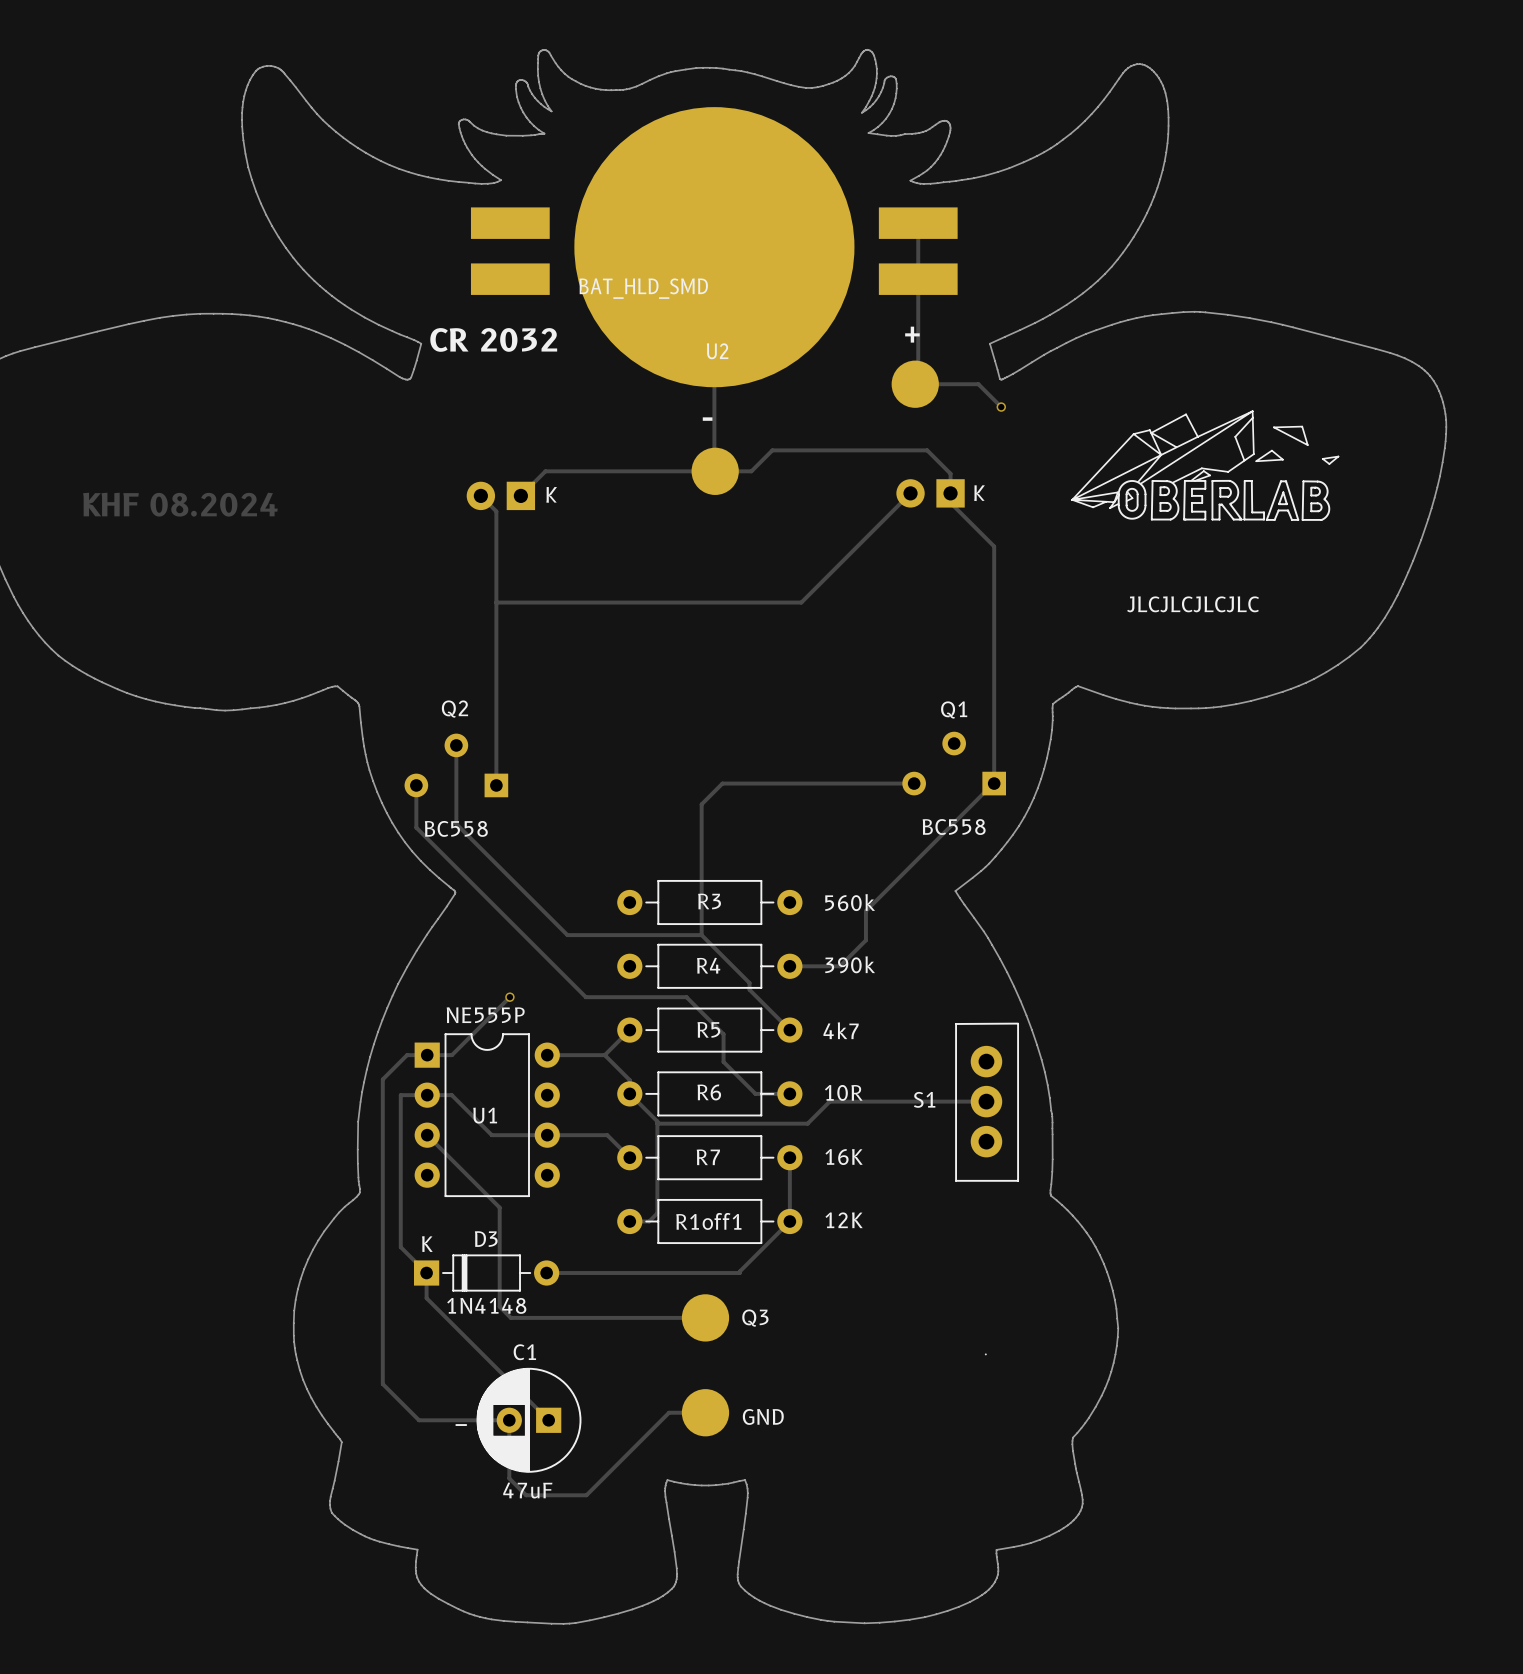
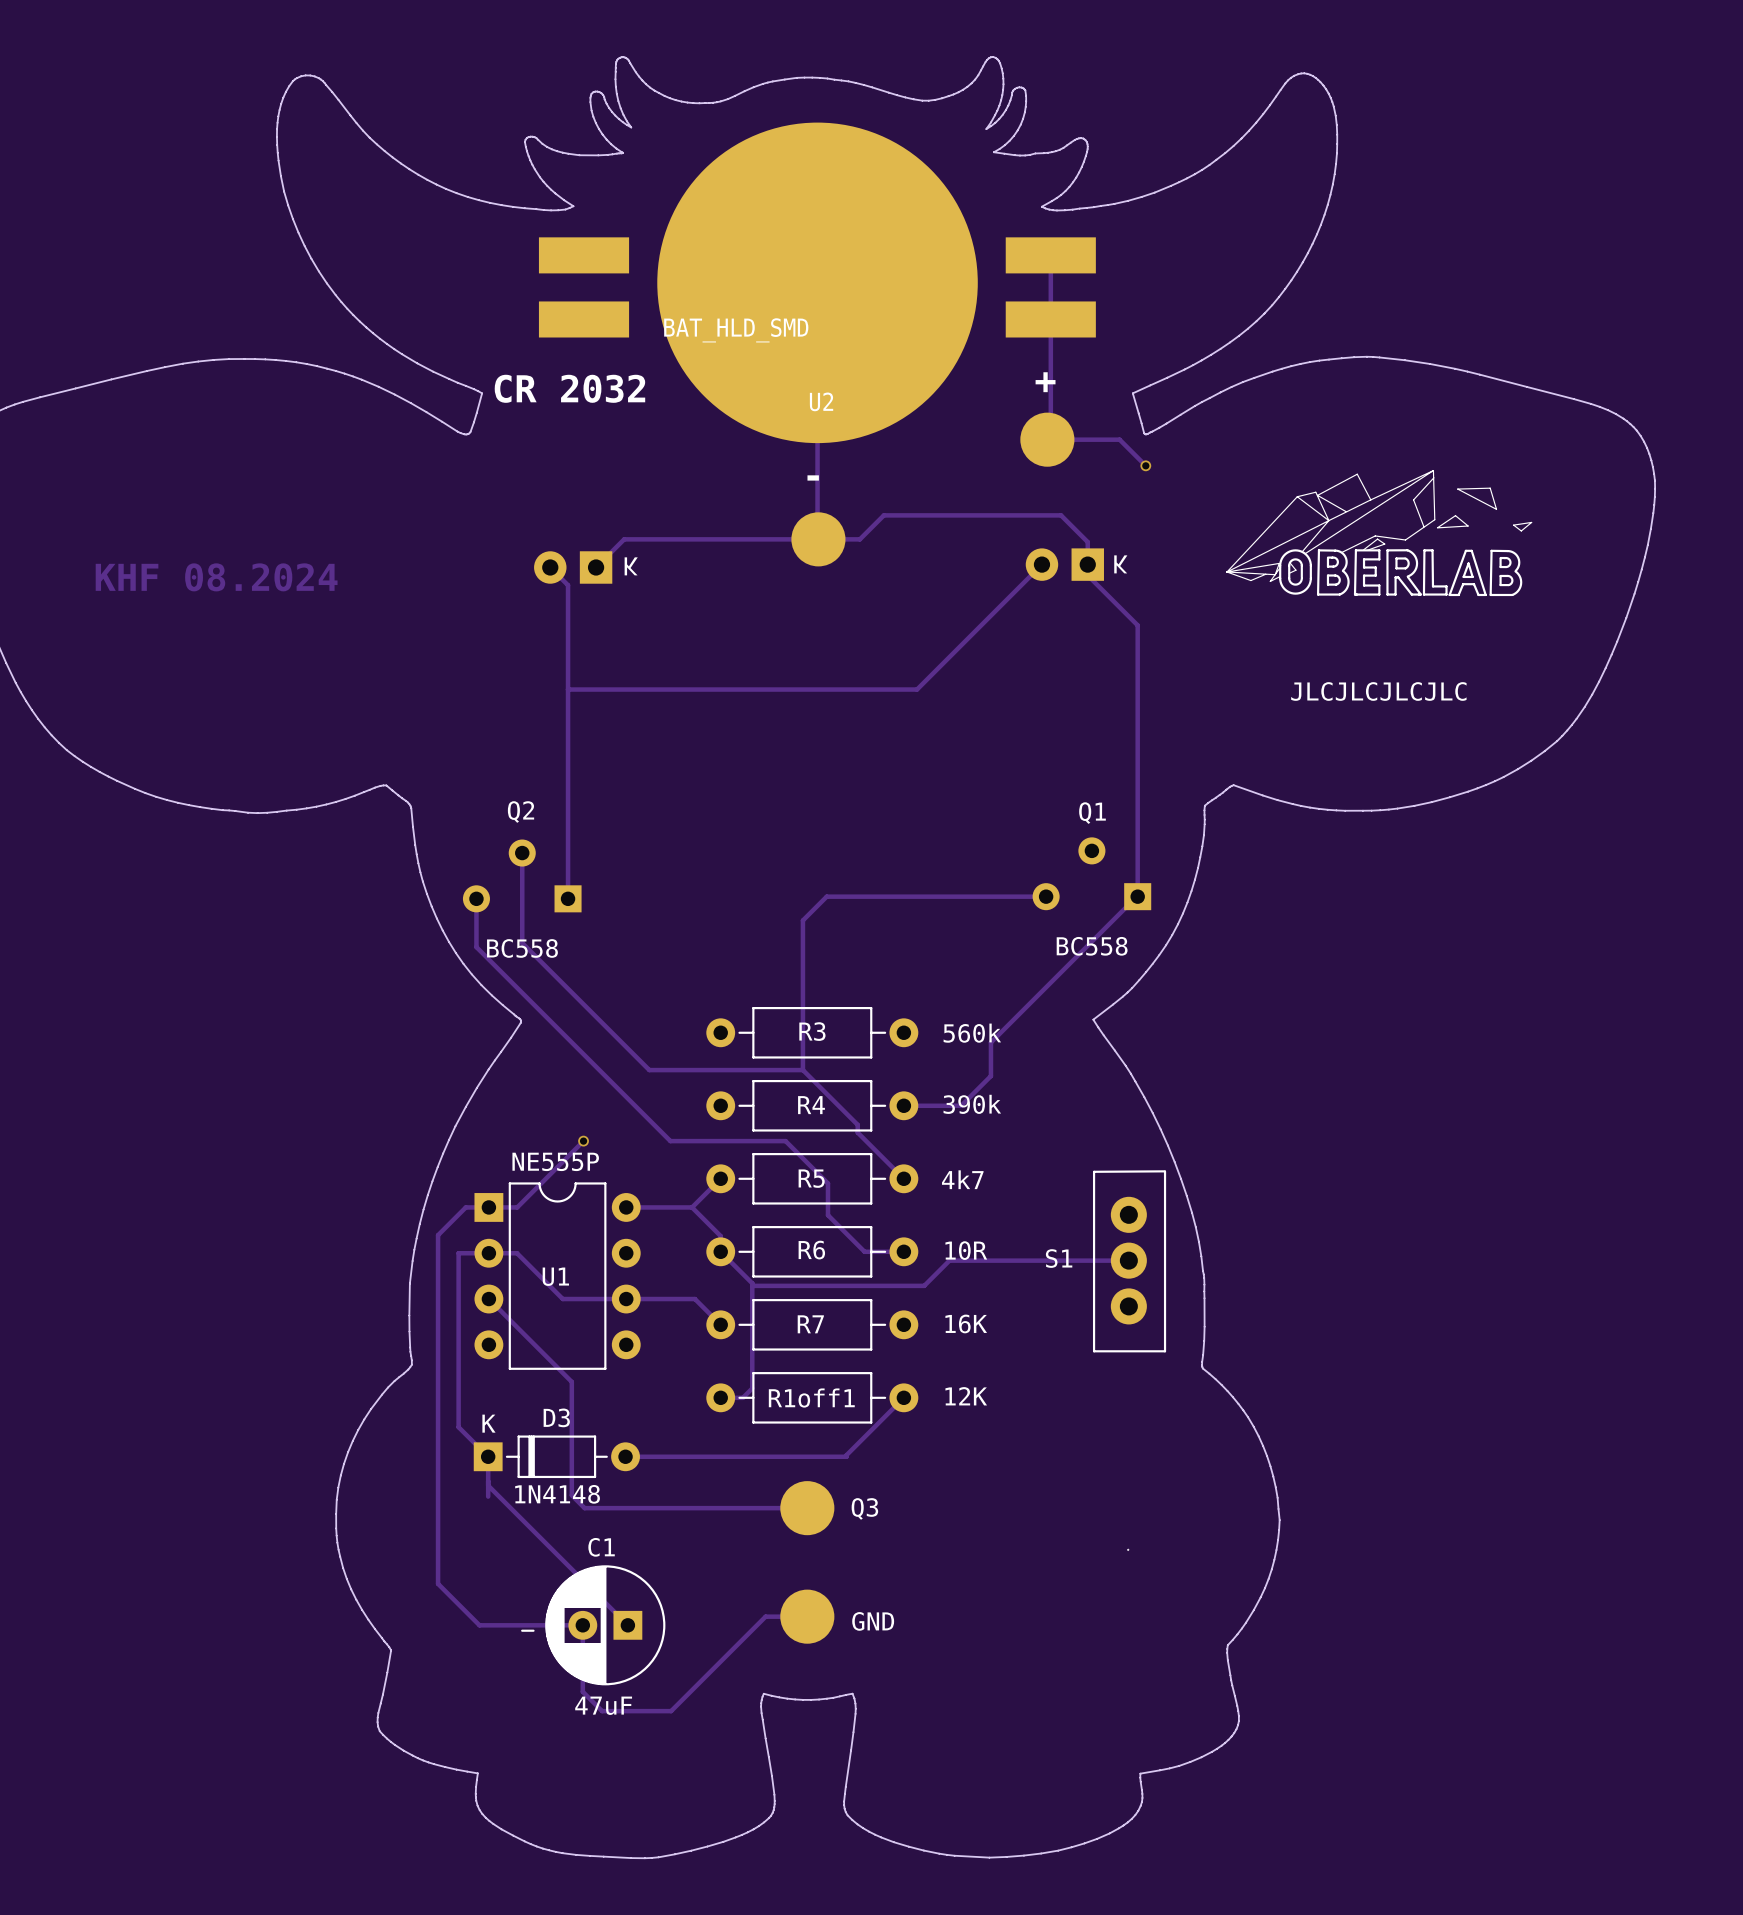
track: (789, 1157) (789, 1221) -> none
track: none -> (488, 1485) (488, 1496)

